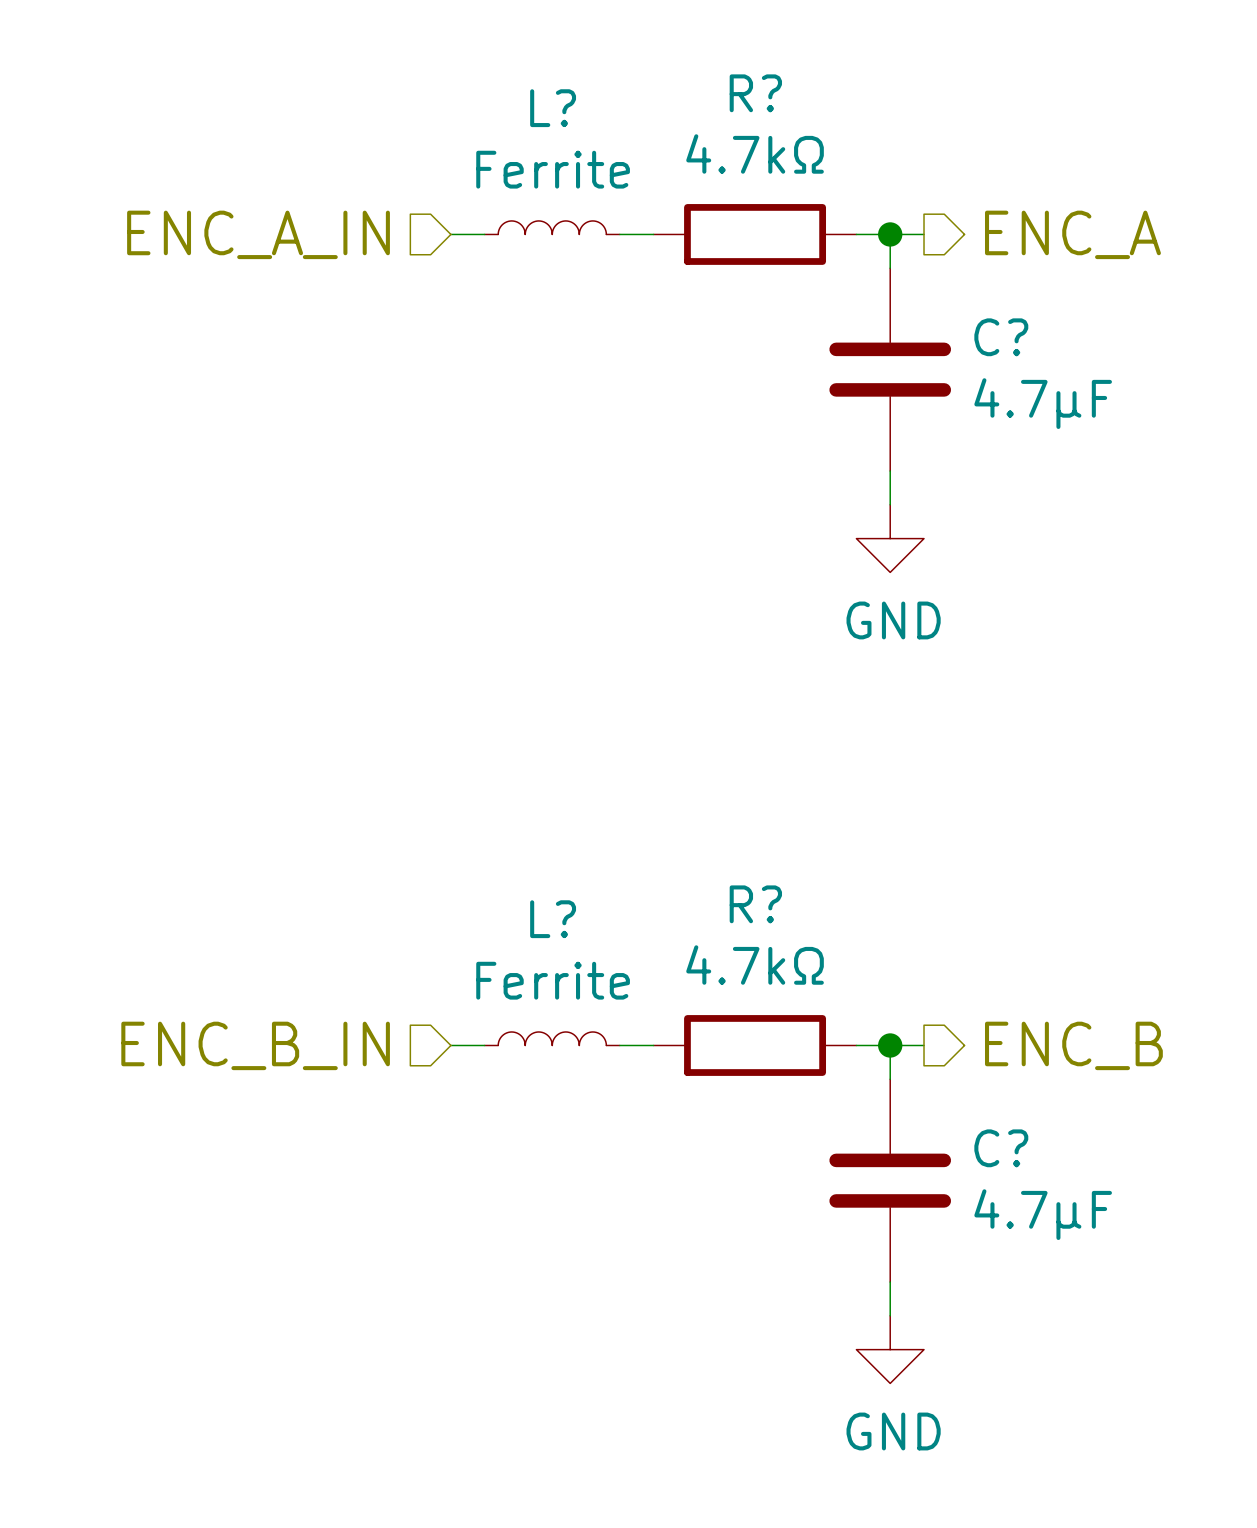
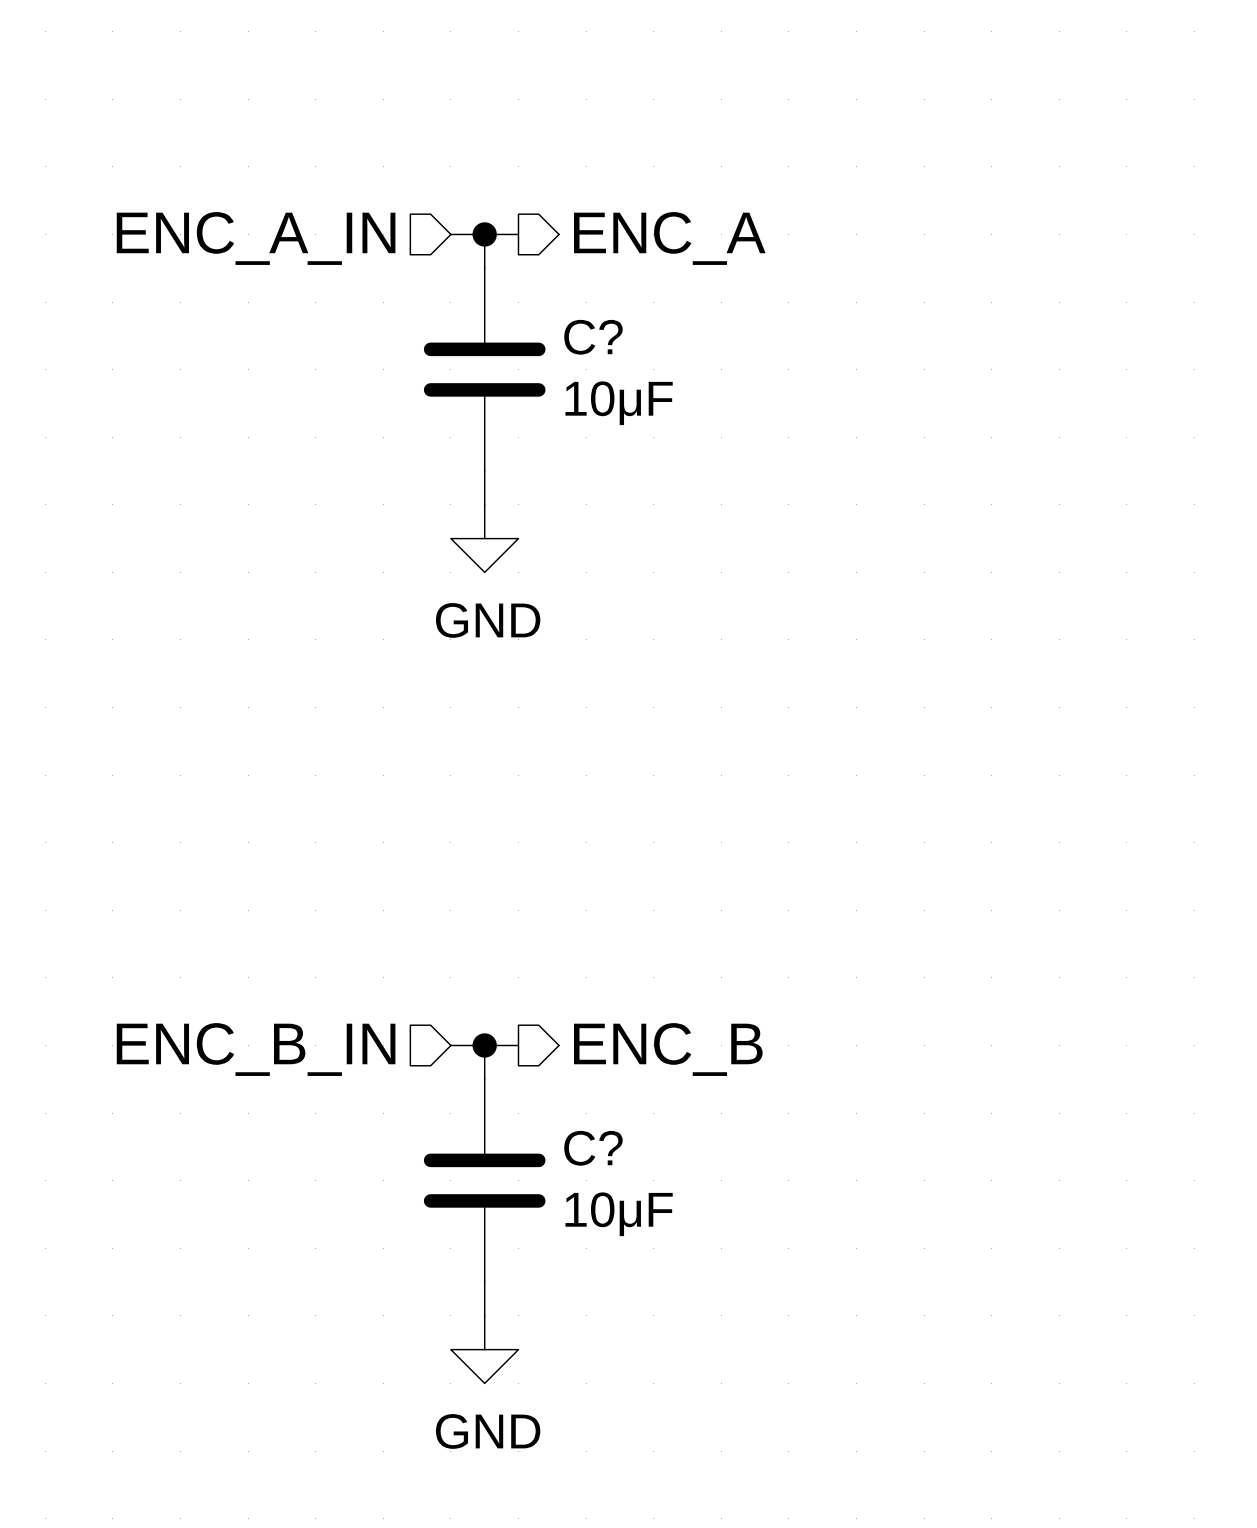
L?: Ferrite (552, 227) -> none
junction: none -> (484, 234)
wire: none -> (518, 234) (484, 234) (484, 268)
wire: (619, 234) (653, 234) -> none
R?: 4.7kΩ (755, 234) -> none
wire: (856, 234) (924, 234) -> none
wire: (890, 234) (890, 268) -> none
junction: (890, 234) -> none
hierarchical label position: ENC_A (1072, 234) -> ENC_A (669, 238)
C?: none -> 10μF (484, 369)
C?: 4.7μF (890, 369) -> none
wire: (890, 471) (890, 504) -> (484, 471) (484, 504)
power symbol position: GND (890, 538) -> GND (484, 538)
L?: Ferrite (552, 1038) -> none
junction: none -> (484, 1045)
wire: none -> (518, 1045) (484, 1045) (484, 1079)
wire: (619, 1045) (653, 1045) -> none
R?: 4.7kΩ (755, 1045) -> none
wire: (856, 1045) (924, 1045) -> none
wire: (890, 1045) (890, 1079) -> none
junction: (890, 1045) -> none
hierarchical label position: ENC_B (1073, 1045) -> ENC_B (668, 1049)
C?: none -> 10μF (484, 1180)
C?: 4.7μF (890, 1180) -> none
wire: (890, 1282) (890, 1315) -> (484, 1282) (484, 1315)
power symbol position: GND (890, 1349) -> GND (484, 1349)

